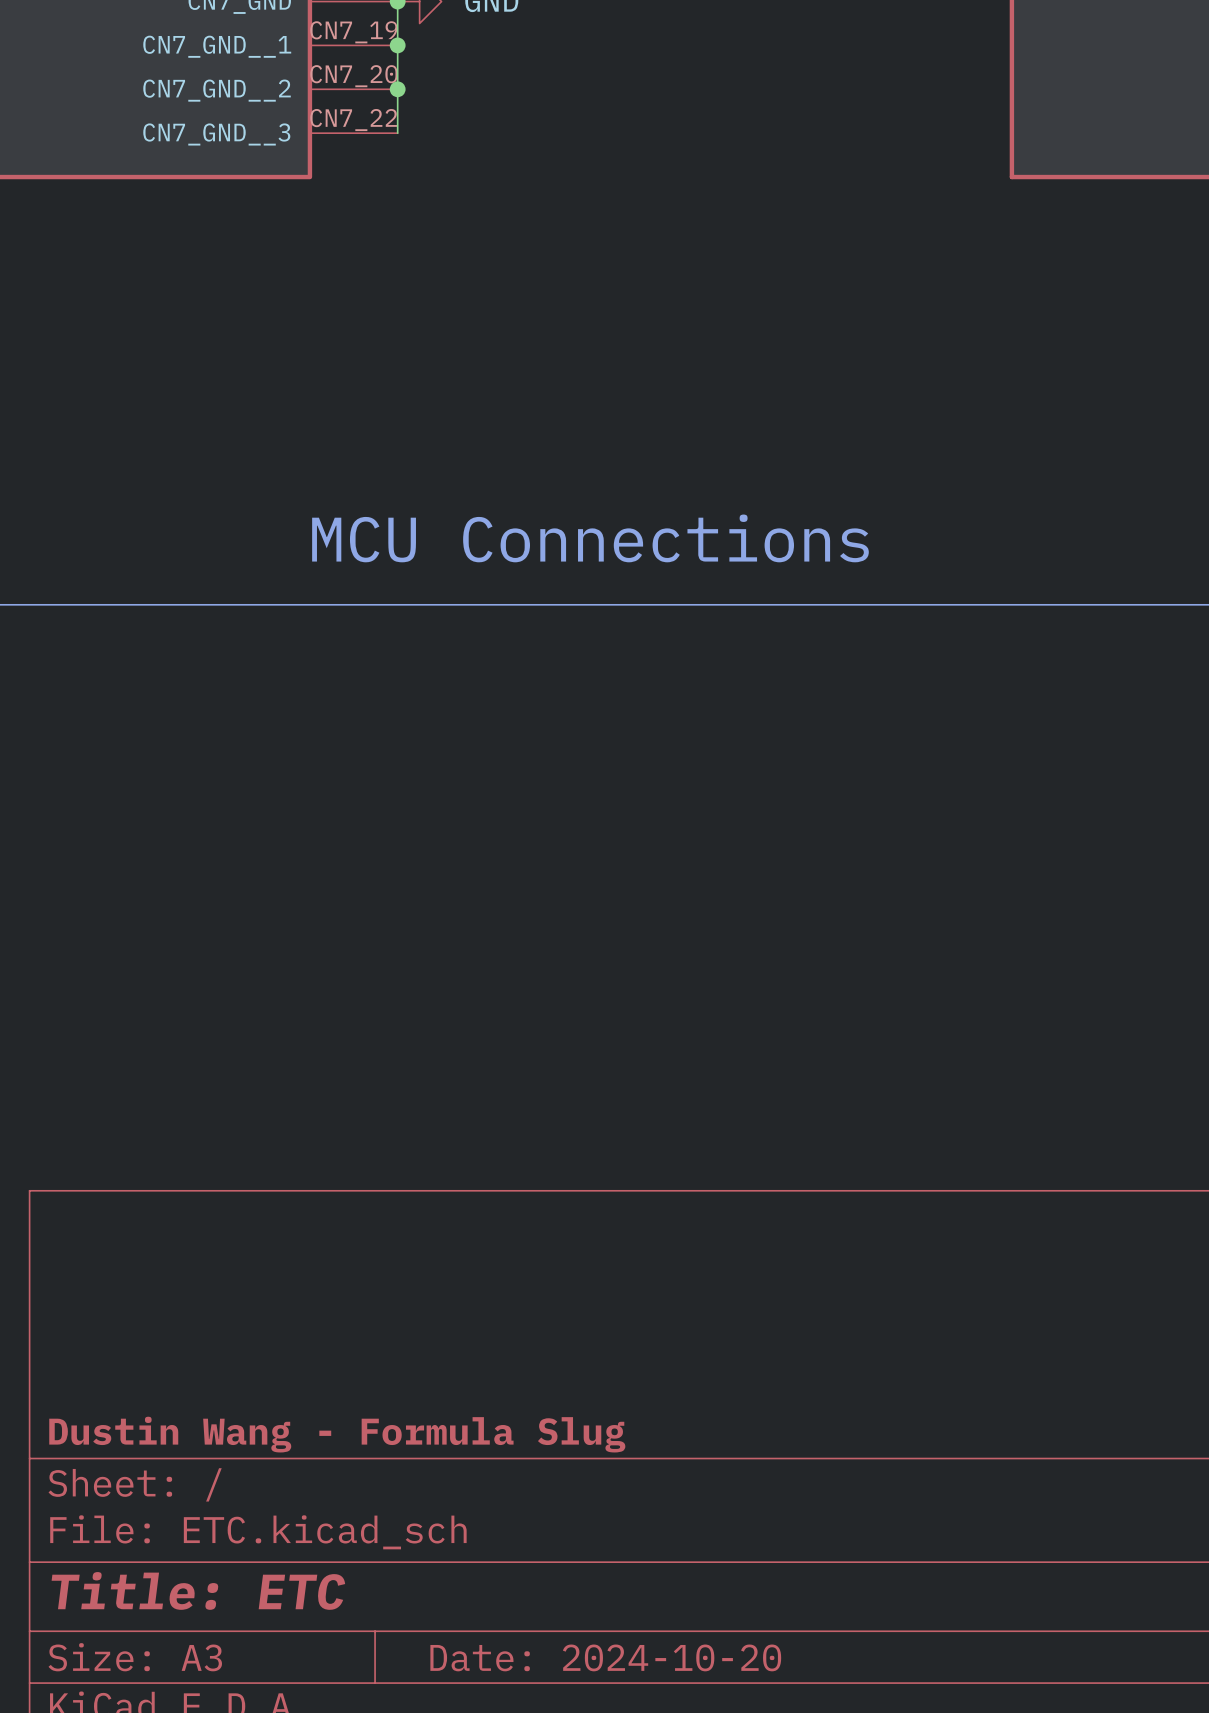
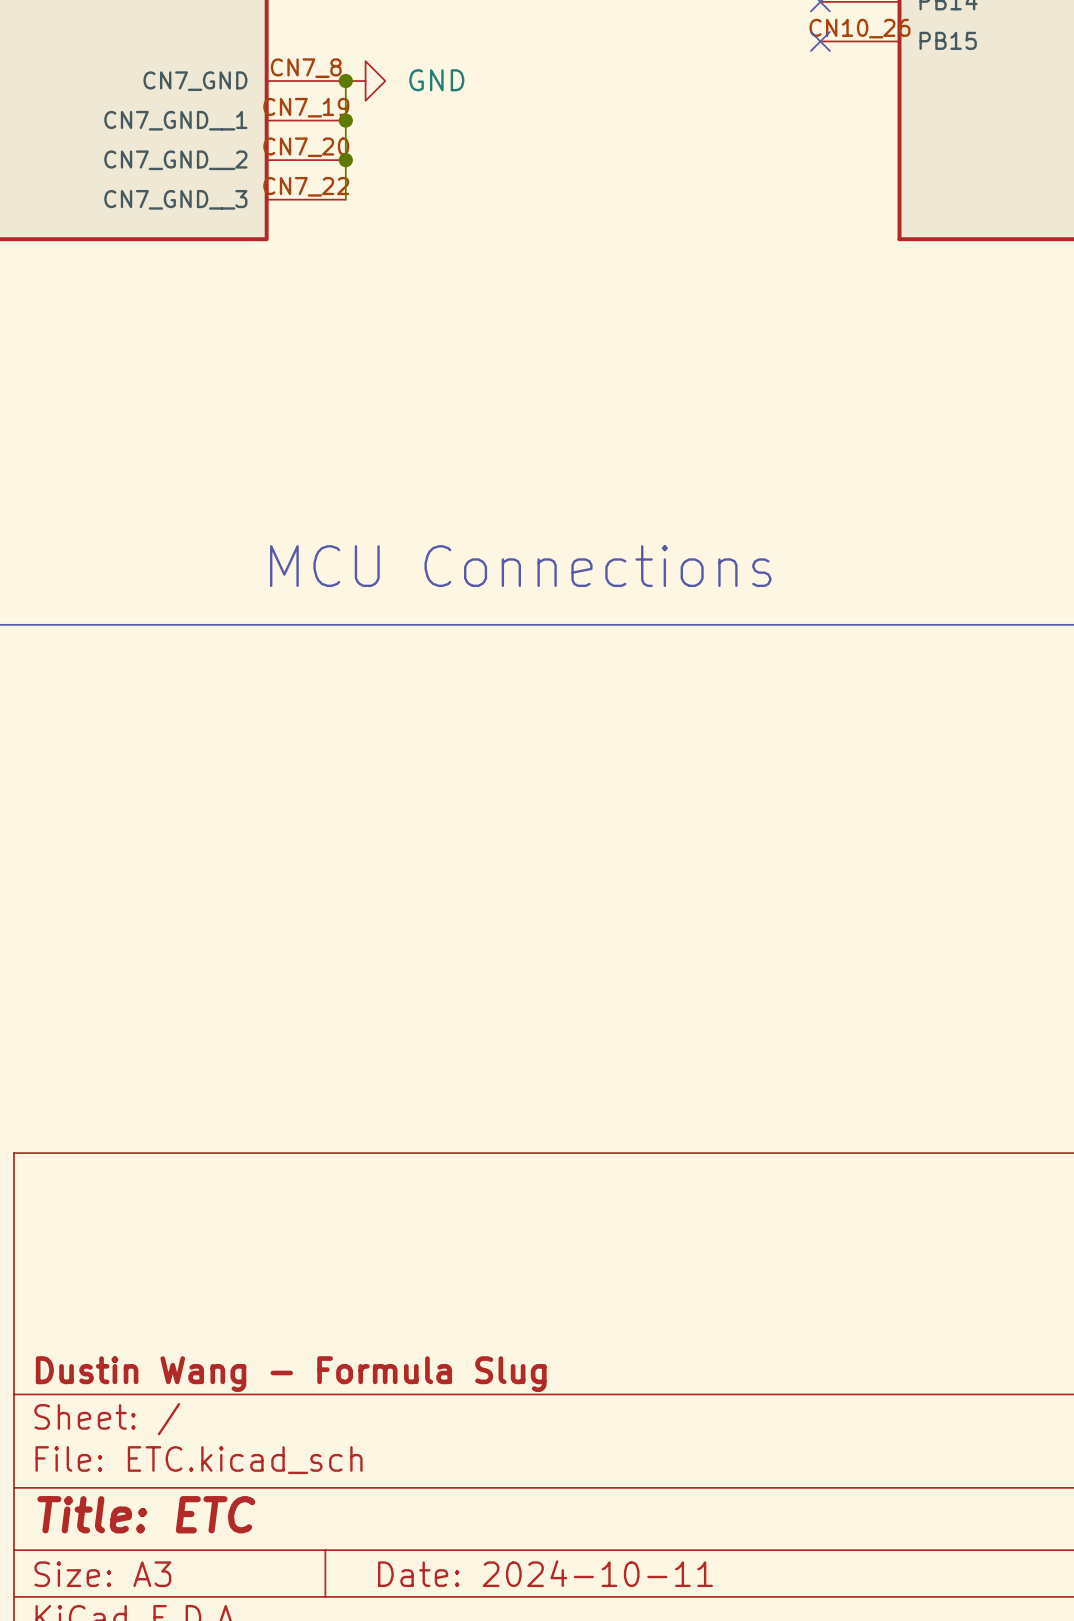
title block: Date: 2024-10-20 (605, 1657) -> Date: 2024-10-11 (545, 1573)

